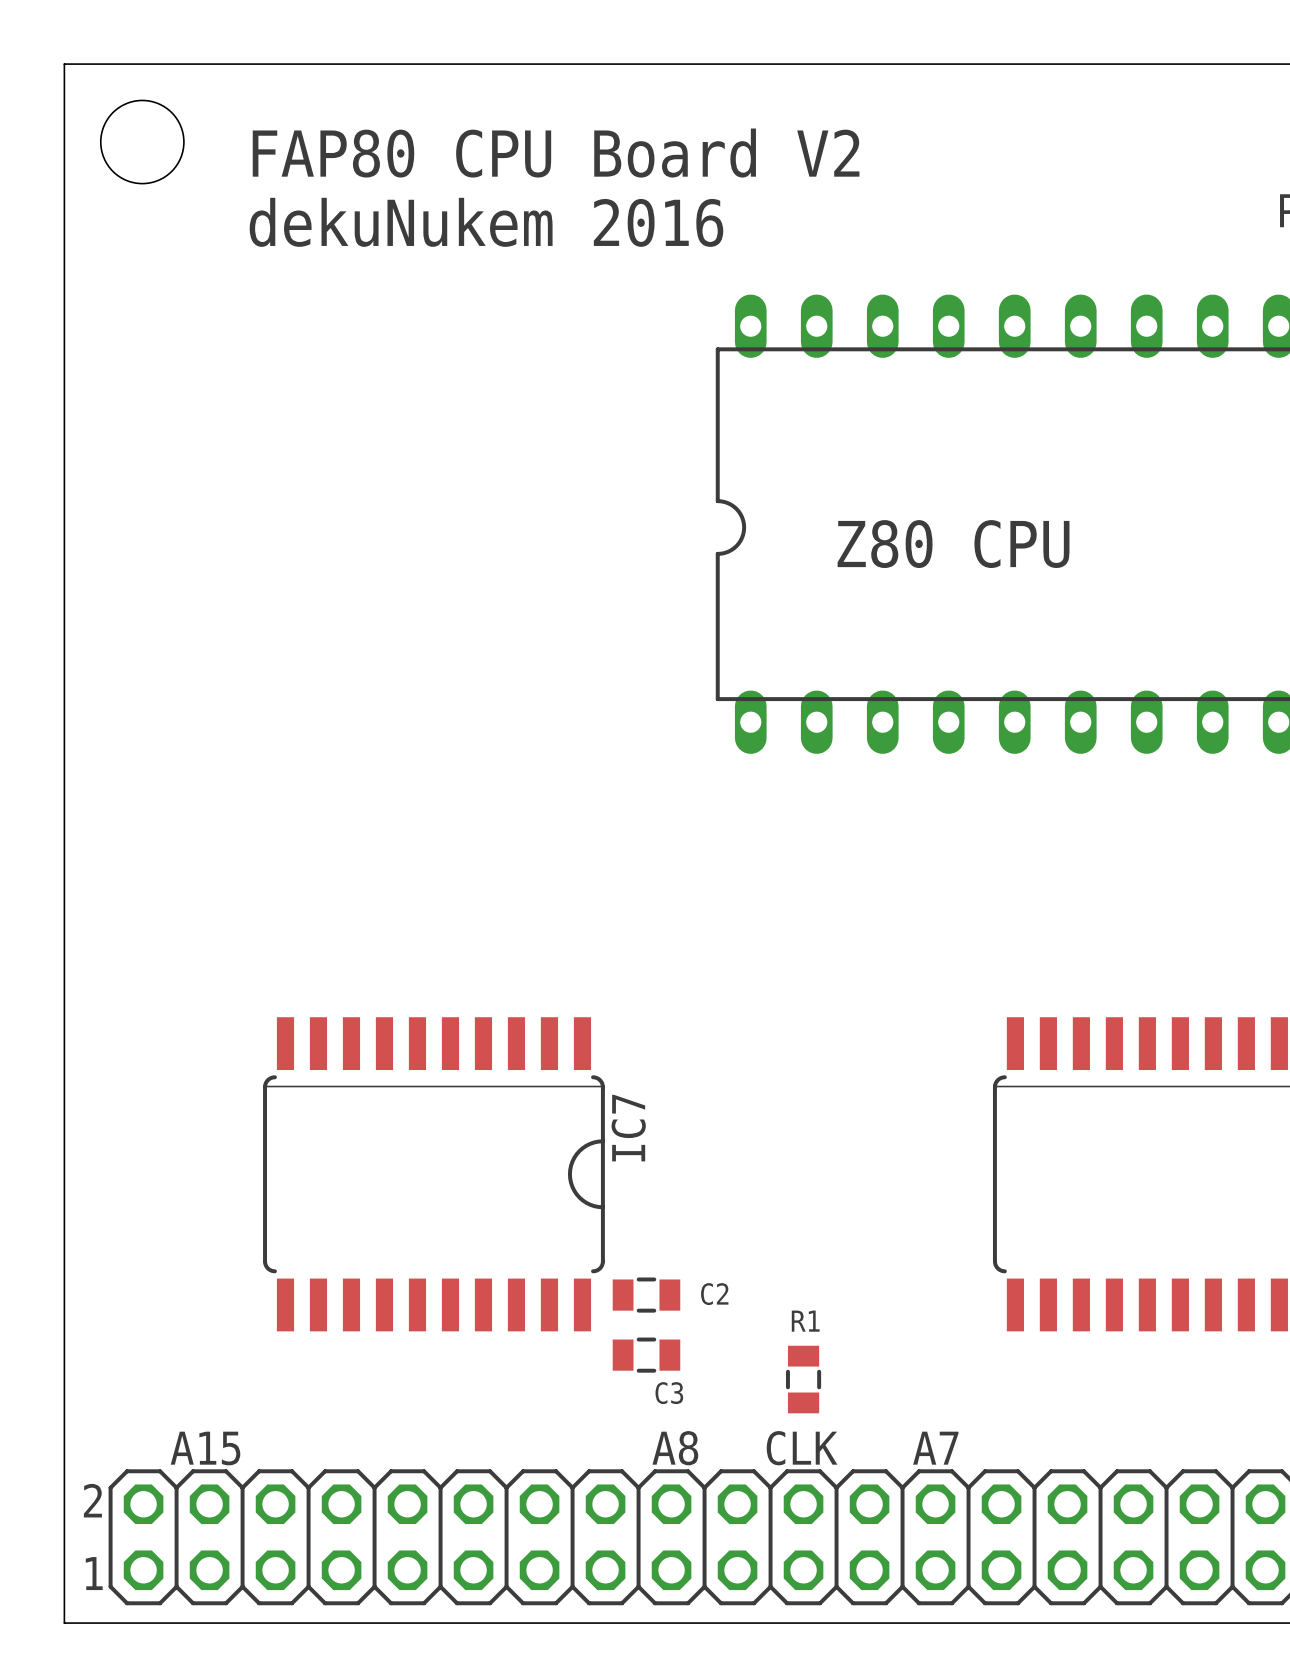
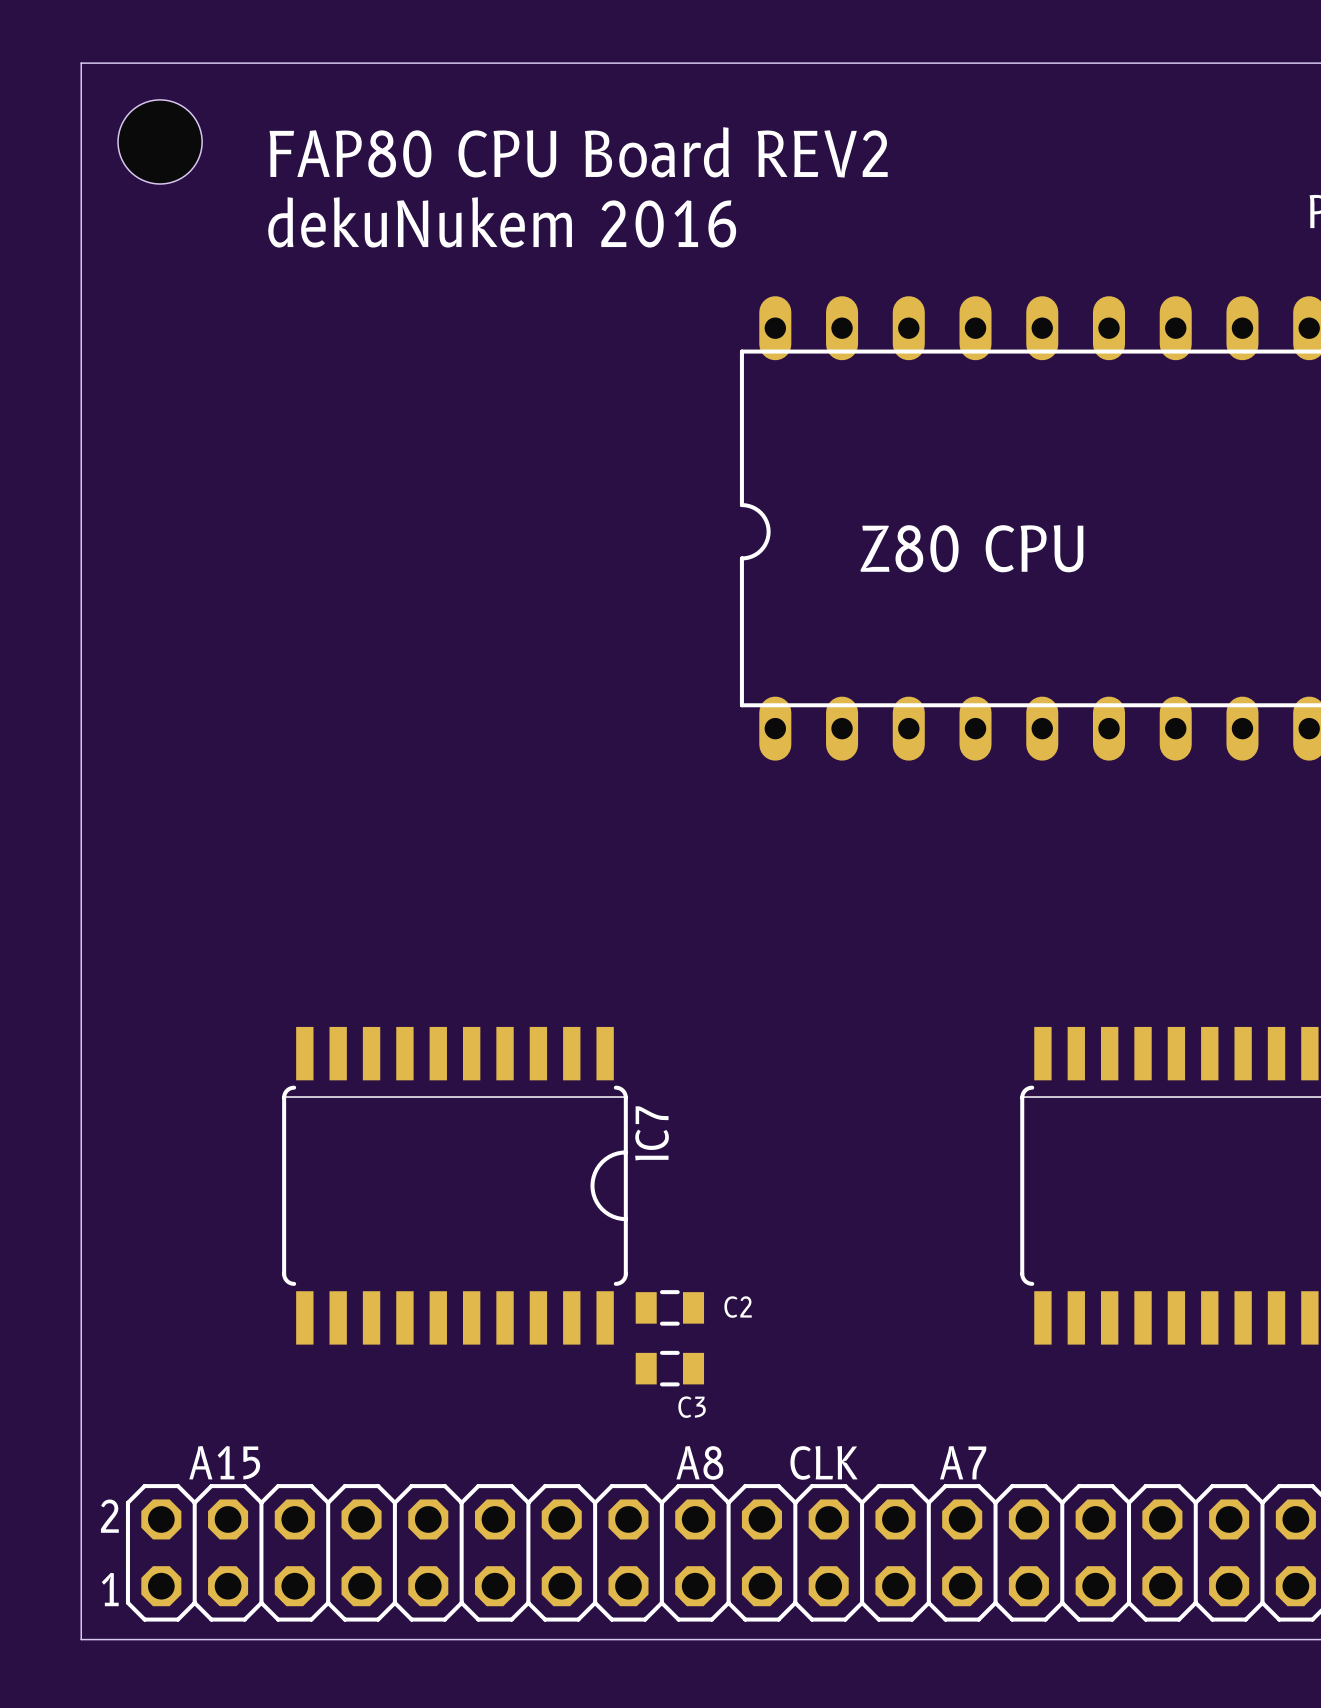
text: FAP80 CPU Board V2 (556, 153) -> FAP80 CPU Board REV2 (578, 152)
R1: (803, 1379) -> none

